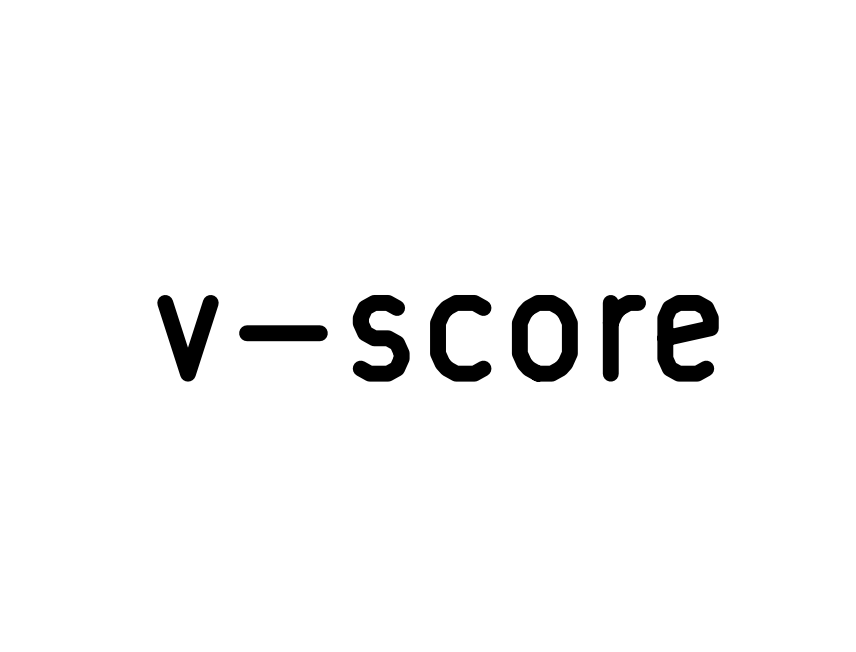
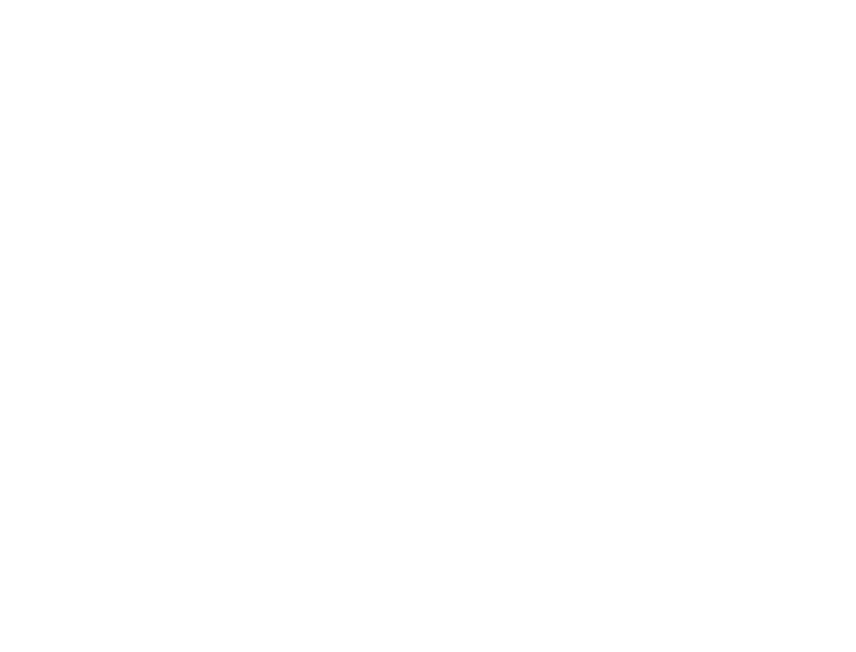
text: v-score (438, 338) -> none

